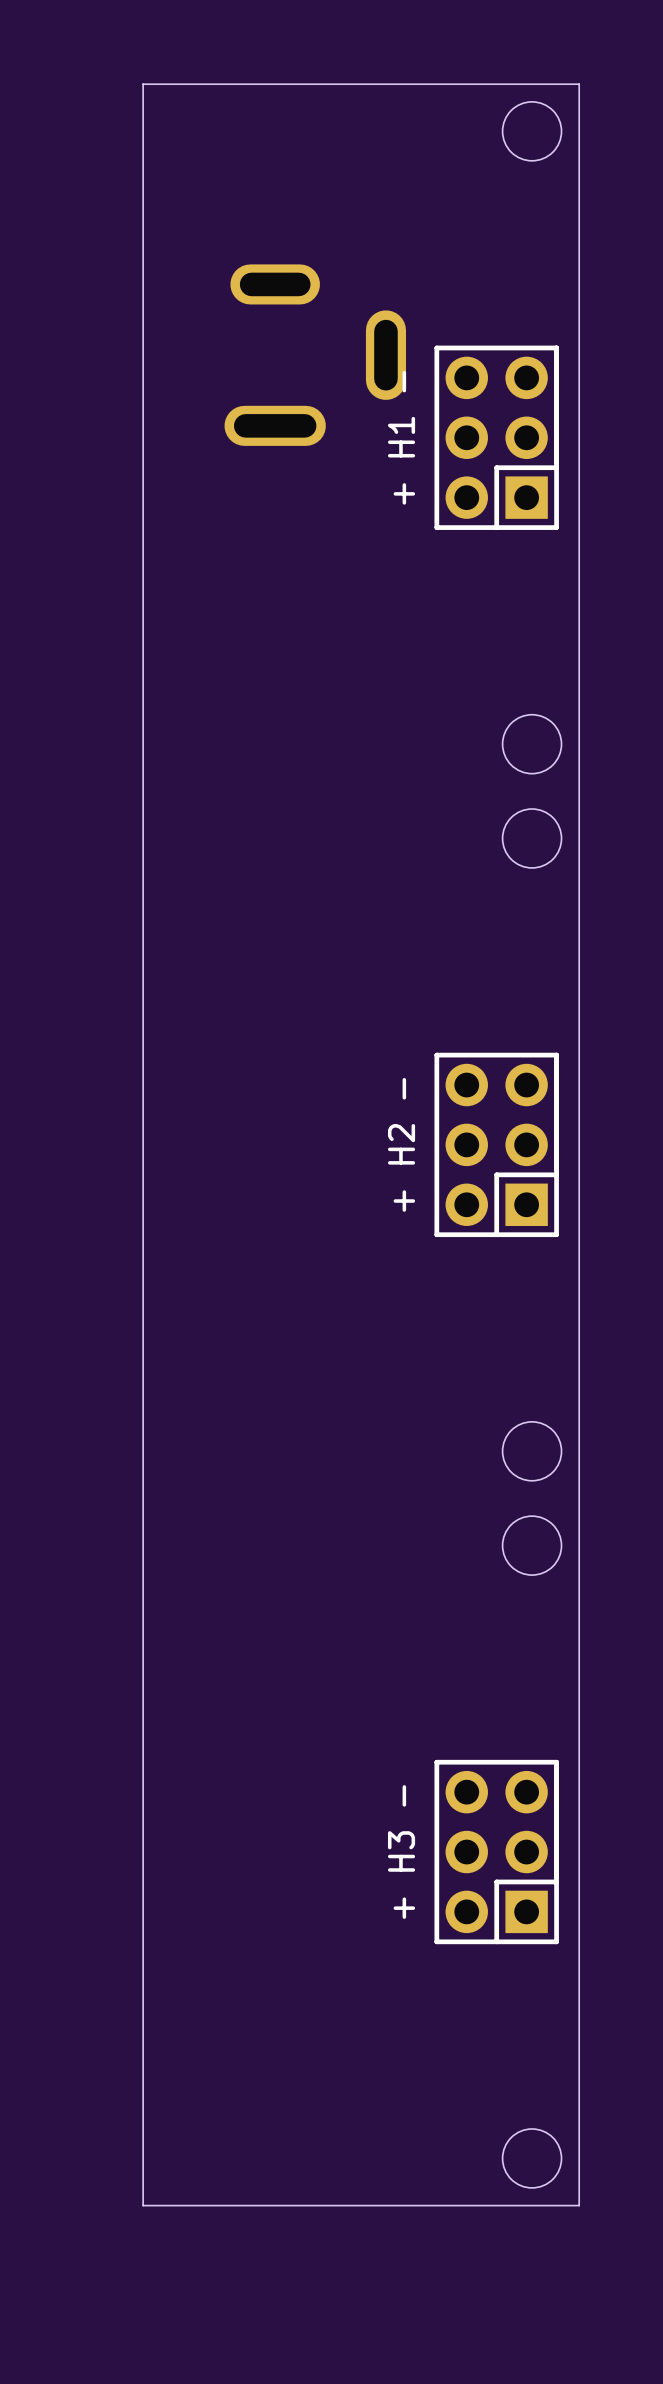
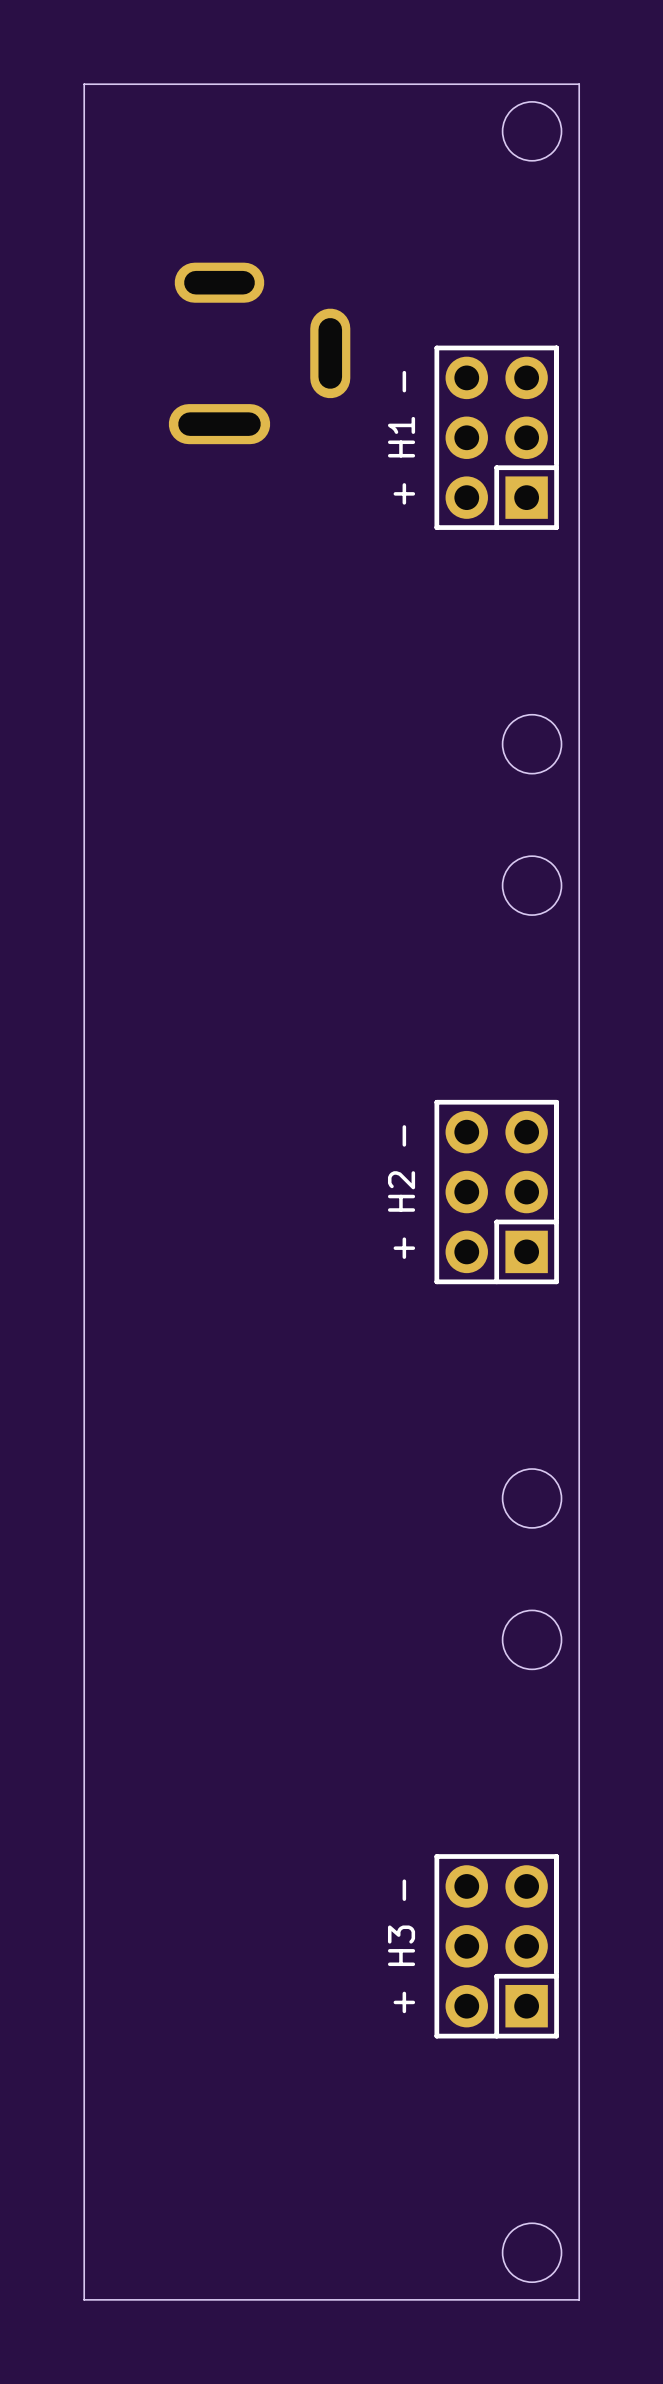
board edge: (143, 84) (143, 2205) (579, 2205) -> (143, 84) (84, 84) (84, 2299) (579, 2299) (579, 2205)
part position: (315, 355) -> (259, 353)
round board edge position: (532, 838) -> (532, 885)
+ H2 - position: (496, 1144) -> (496, 1192)
round board edge: [502, 1421, 563, 1482] -> none
round board edge: none -> [502, 1468, 563, 1529]
round board edge: [502, 1515, 563, 1576] -> none
round board edge: none -> [502, 1609, 563, 1670]
+ H3 - position: (496, 1852) -> (496, 1946)
round board edge position: (532, 2158) -> (532, 2252)

